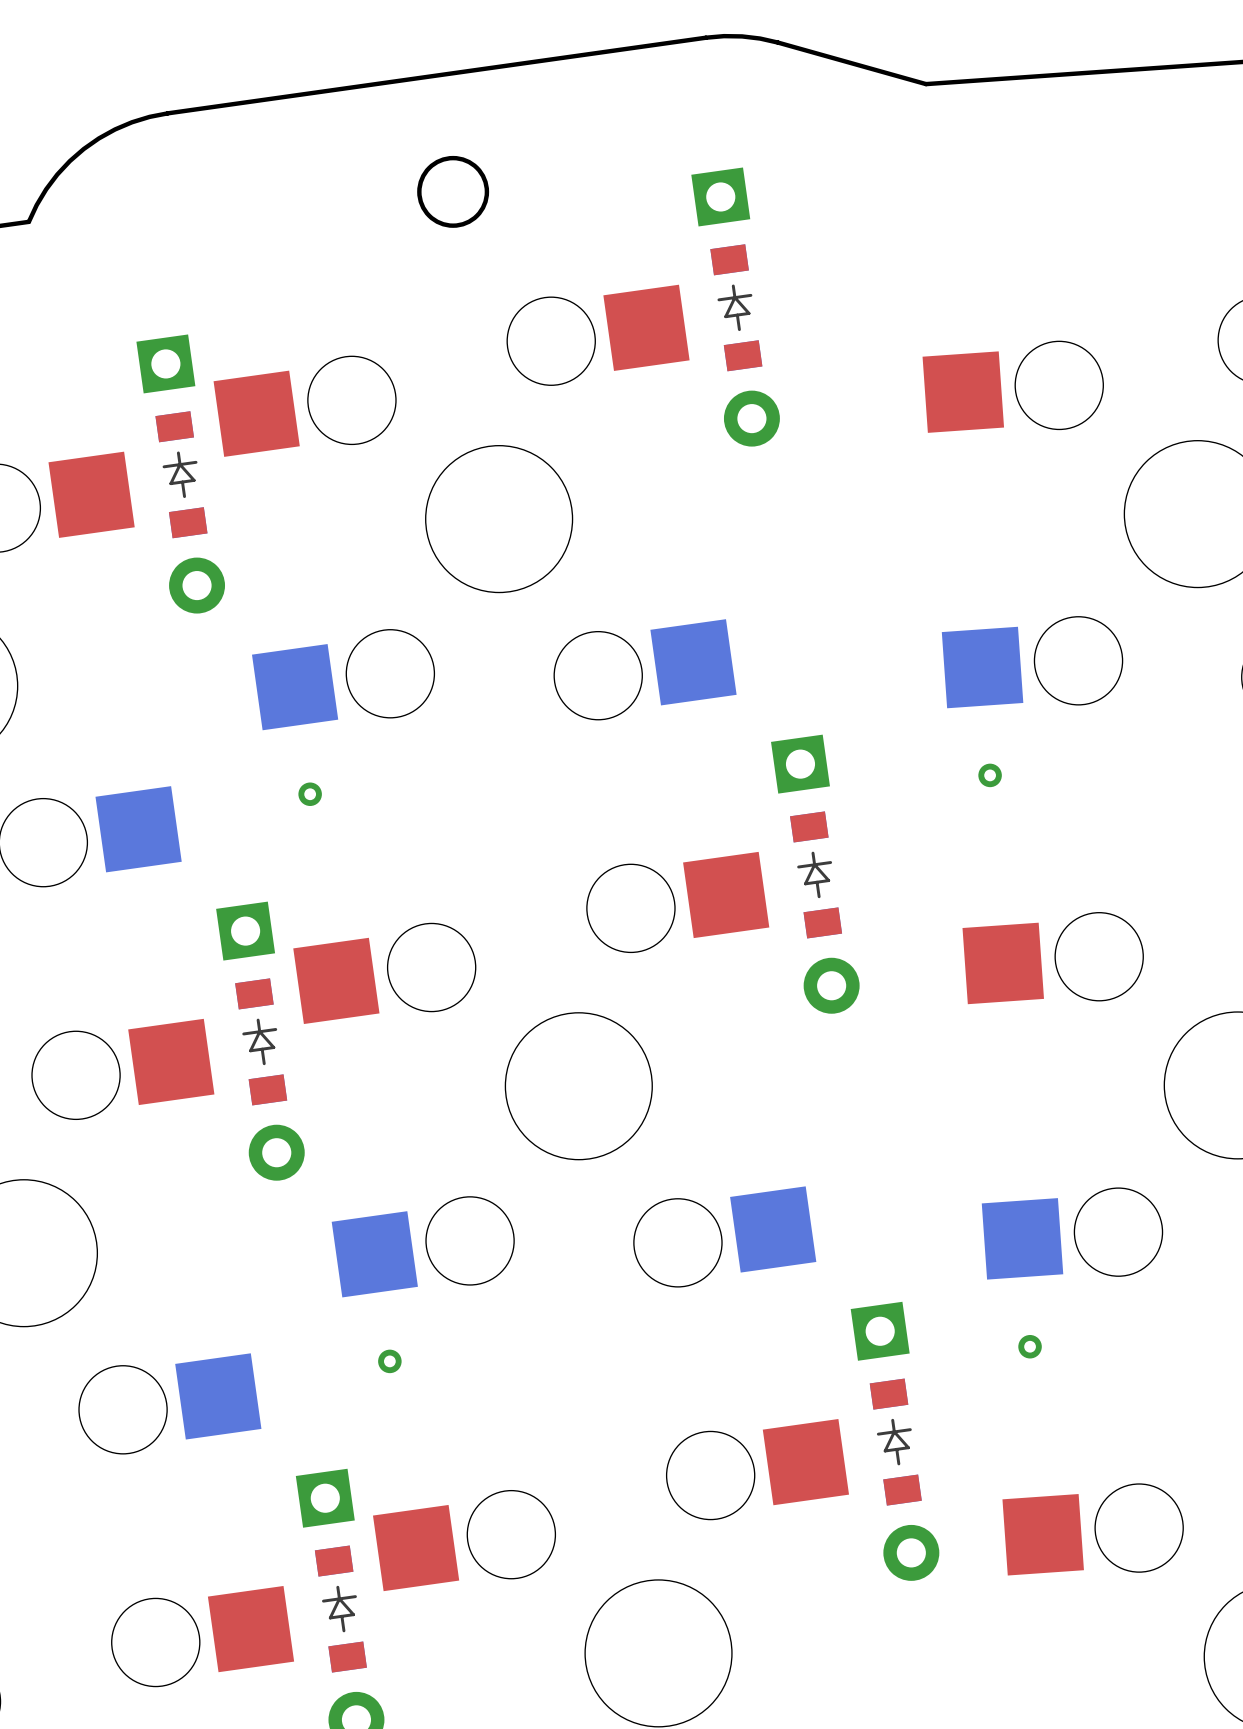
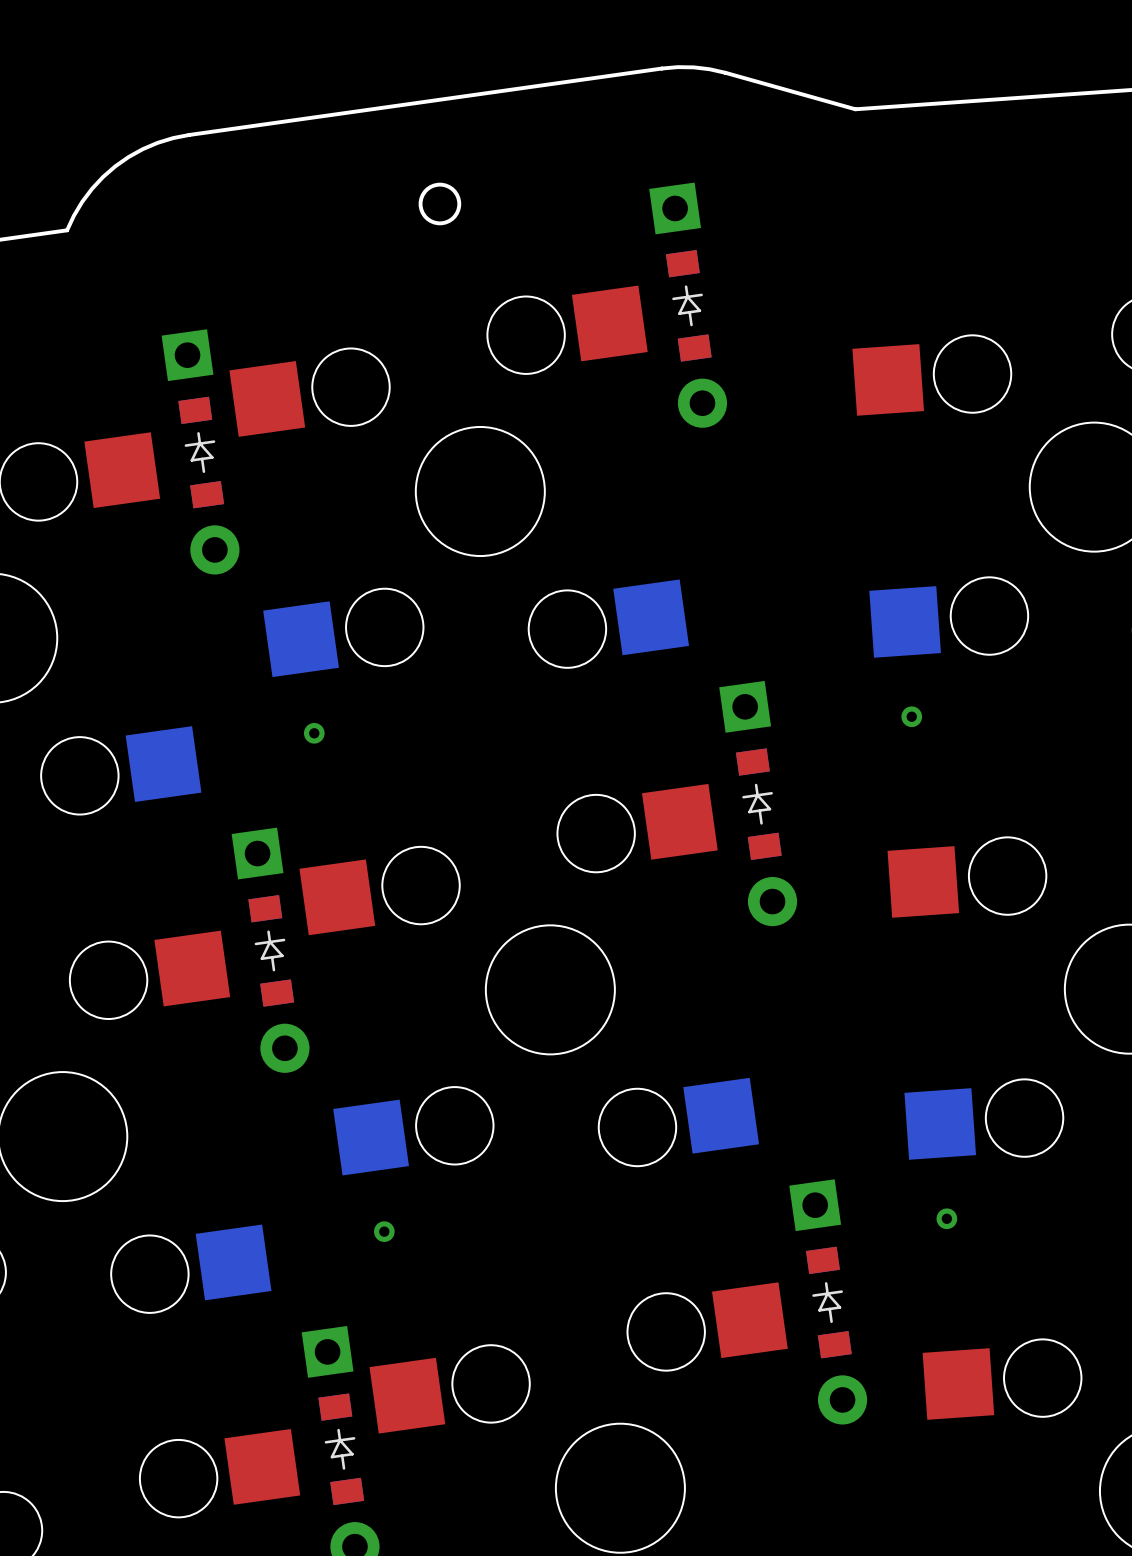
round board edge size: [417, 155, 490, 228] -> [418, 182, 462, 226]

